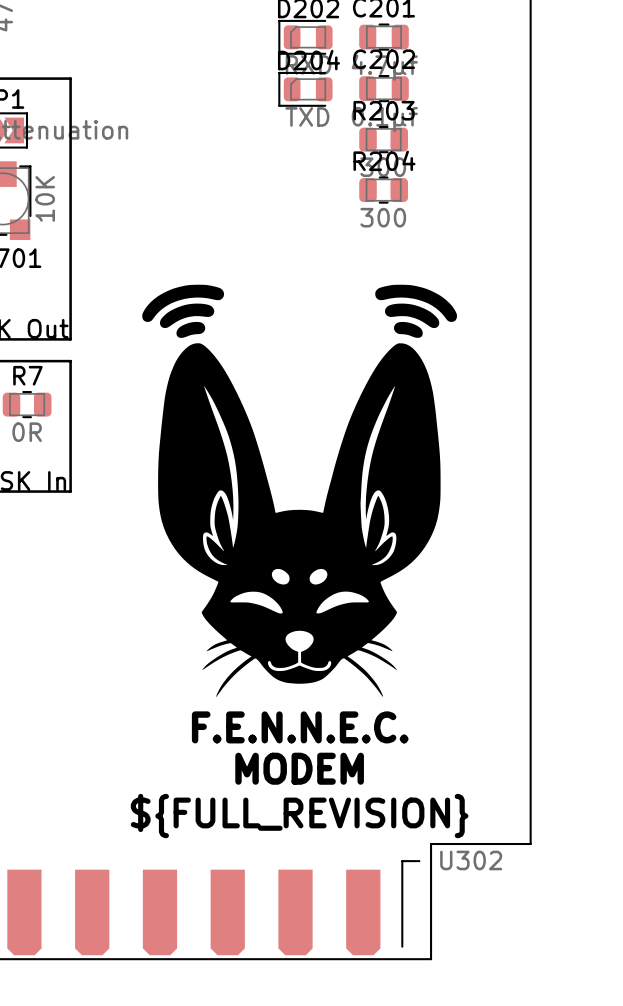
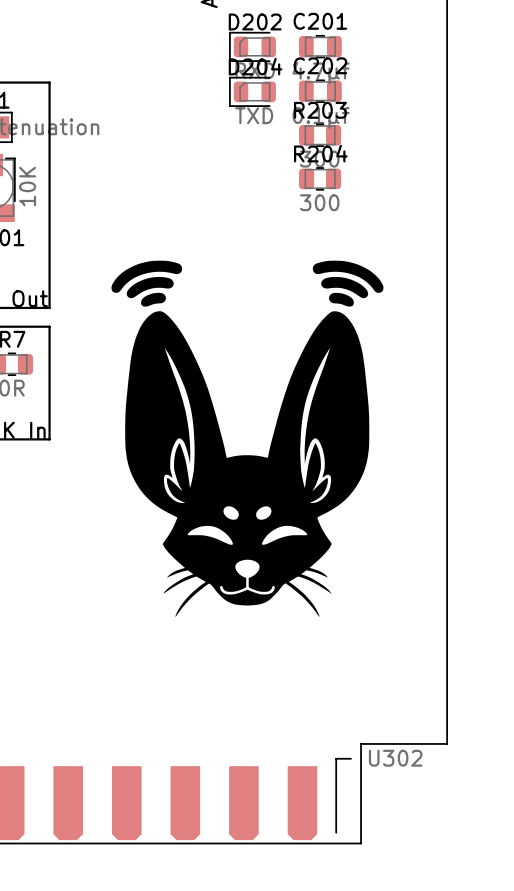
text: F.E.N.N.E.C. (300, 727) -> none
text: MODEM (299, 768) -> none
text: ${FULL_REVISION} (299, 816) -> none

